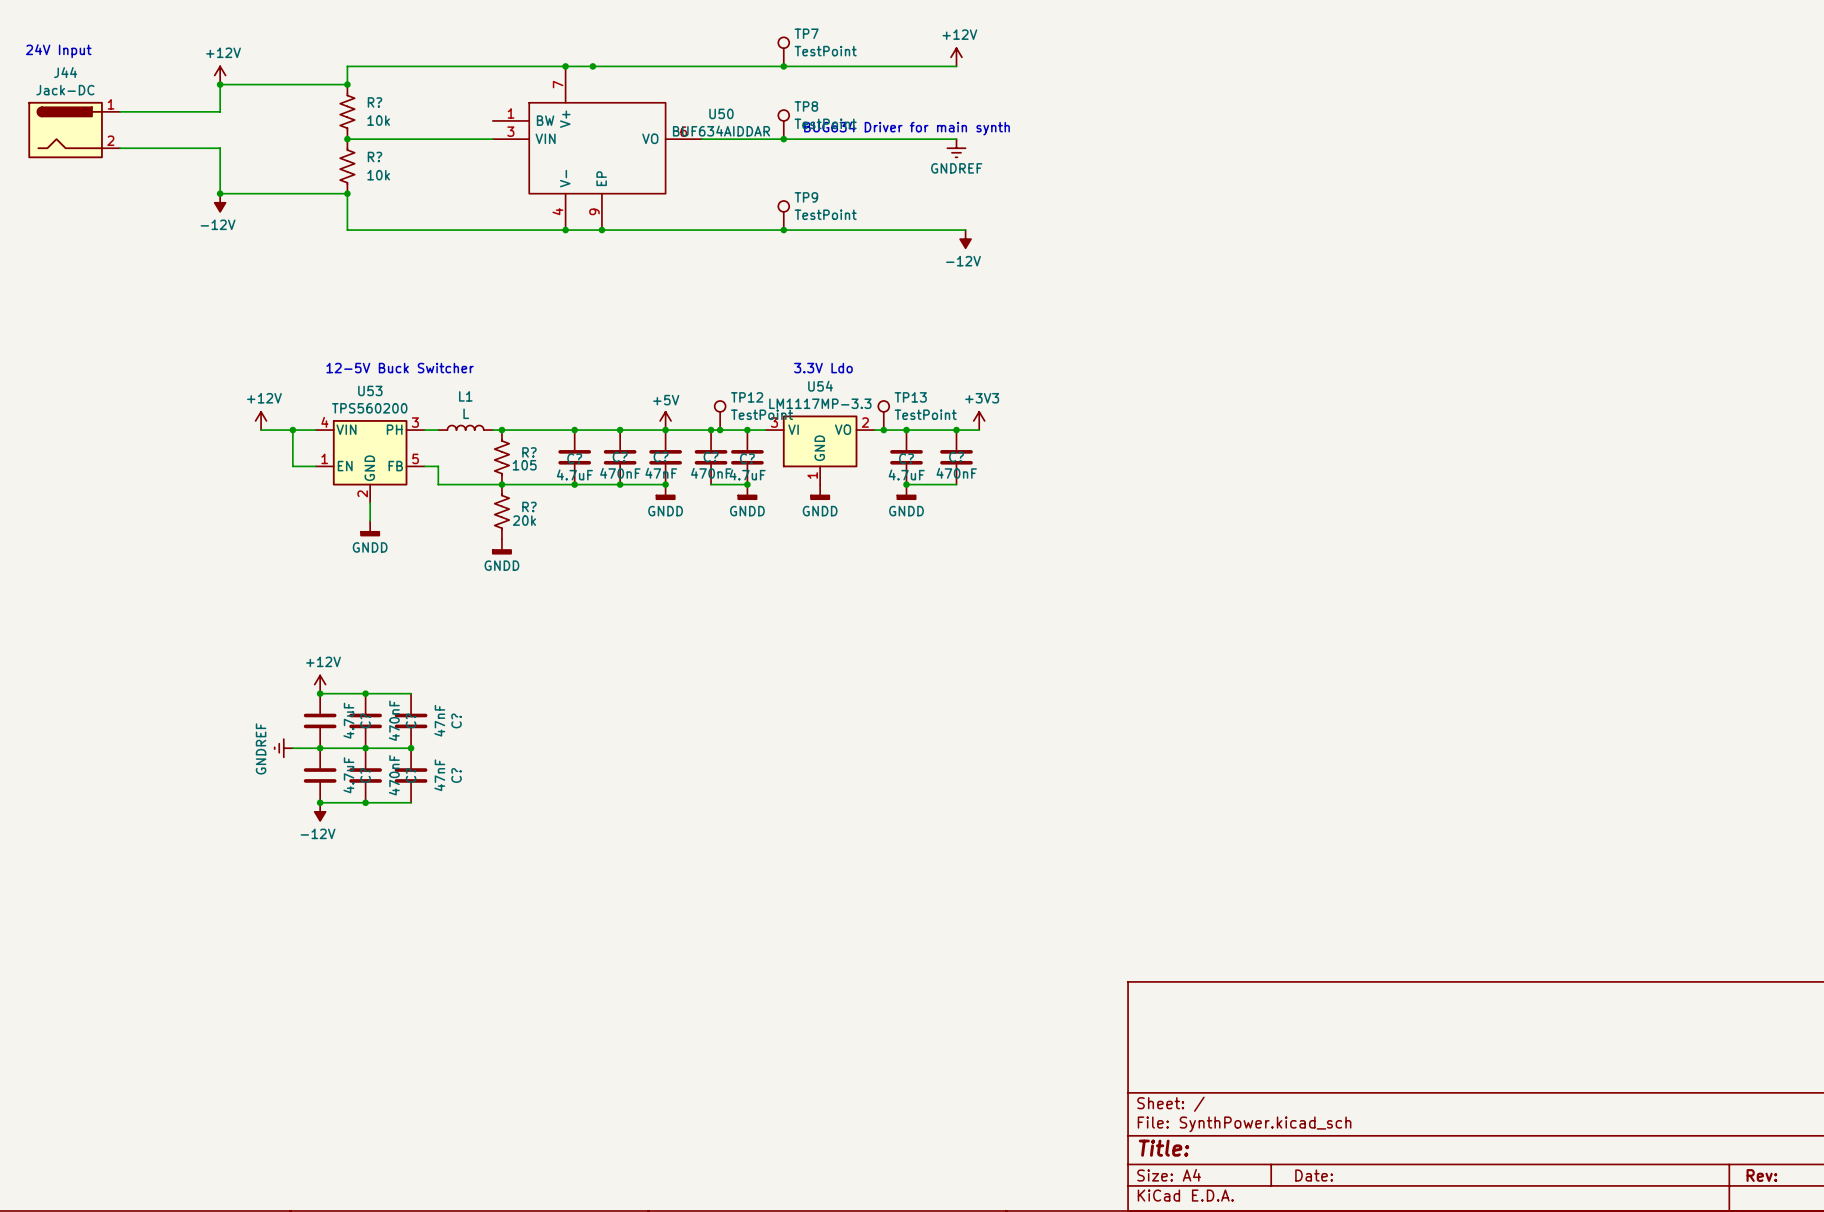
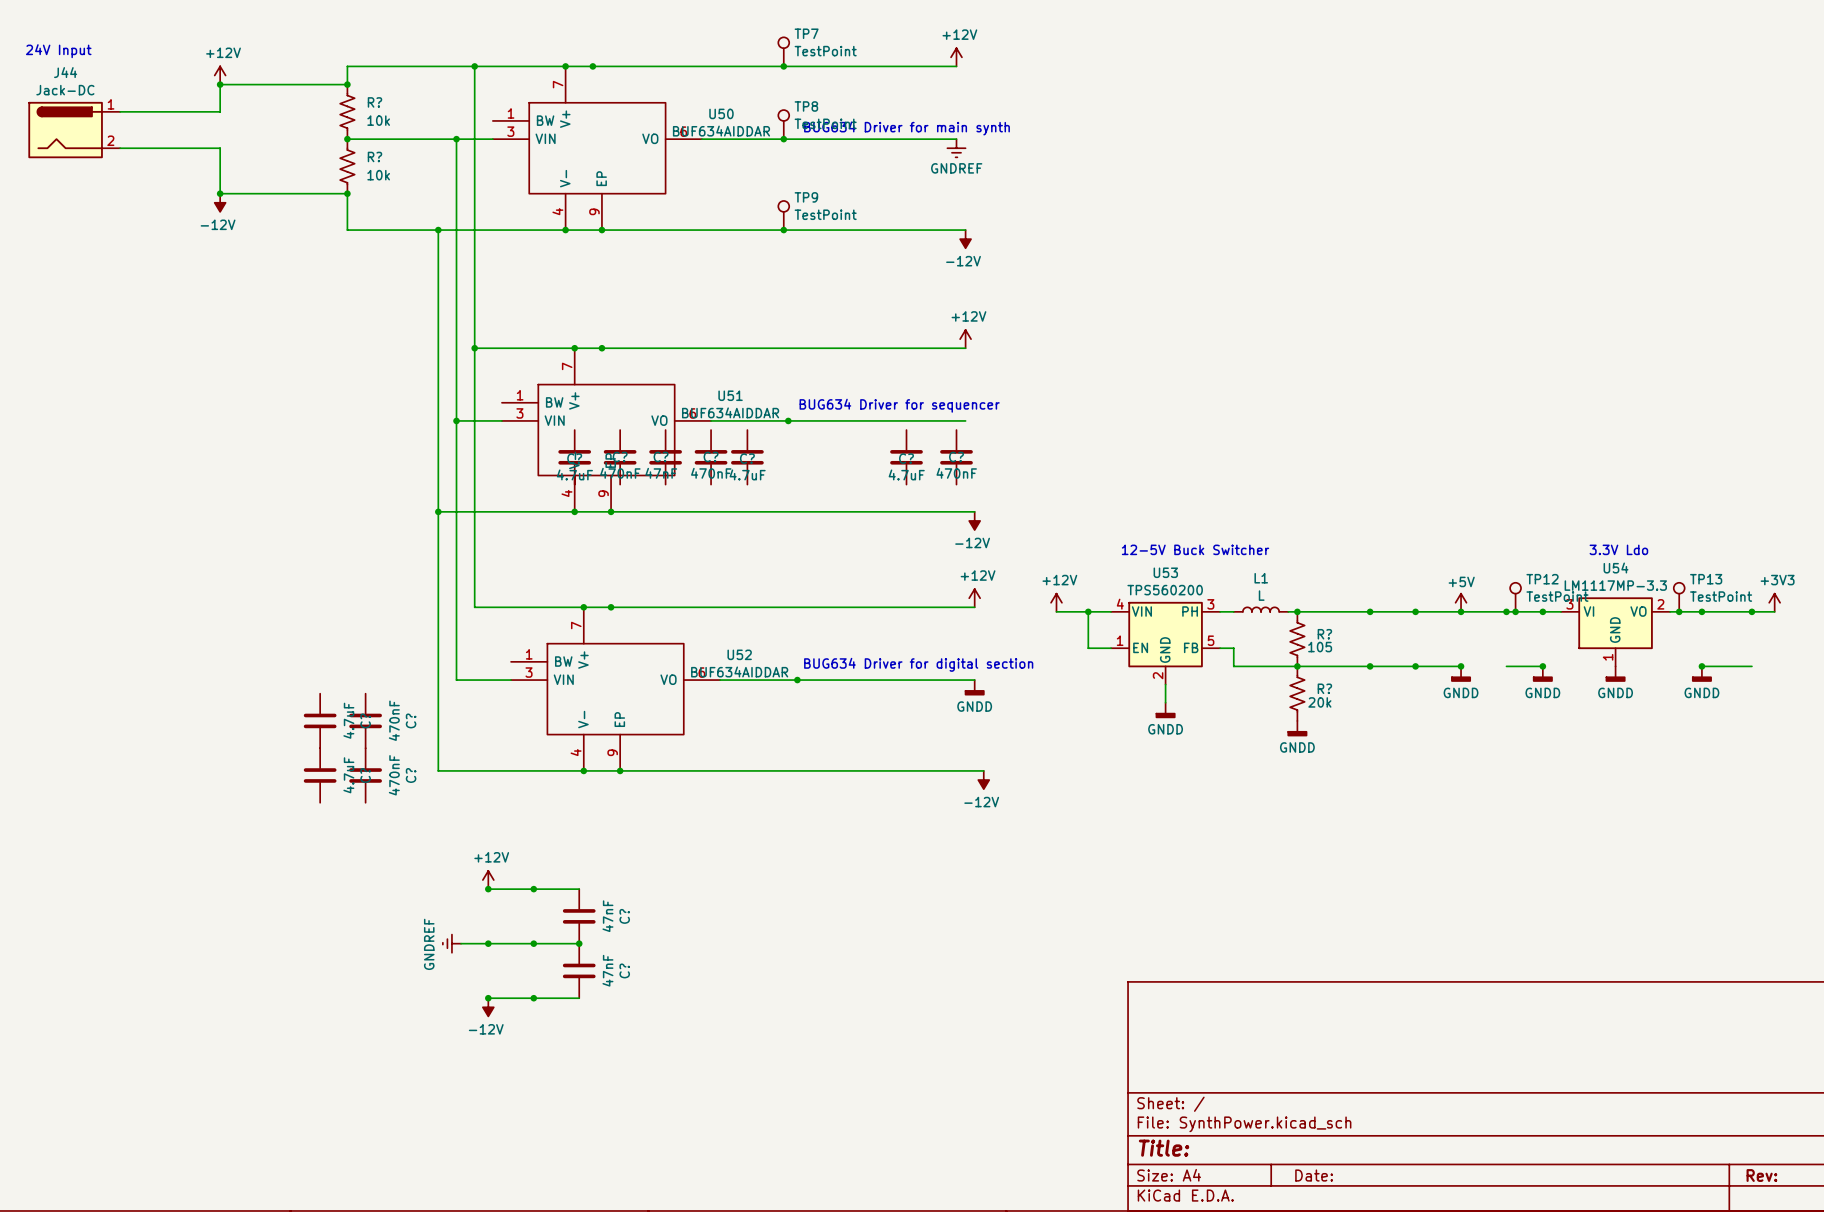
wire: none -> (474, 66) (474, 607) (974, 607)
junction: none -> (474, 66)
wire: none -> (456, 139) (456, 680) (511, 680)
junction: none -> (456, 139)
junction: none -> (438, 230)
power symbol: none -> +12V (965, 339)
wire: none -> (474, 348) (965, 348)
junction: none -> (474, 348)
junction: none -> (574, 348)
junction: none -> (601, 348)
text: 12-5V Buck Switcher (400, 368) -> none
text: 3.3V Ldo (823, 368) -> none
text: none -> BUG634 Driver for sequencer (899, 405)
TP12 position: (720, 415) -> (1515, 597)
TP13 position: (883, 415) -> (1679, 597)
power symbol: +12V (261, 420) -> none
wire: none -> (456, 420) (501, 420)
junction: none -> (456, 420)
power symbol: +5V (665, 420) -> none
wire: none -> (711, 420) (965, 420)
junction: none -> (788, 420)
power symbol: +3V3 (979, 420) -> none
L1 position: (465, 427) -> (1261, 609)
wire: (261, 430) (315, 430) -> none
wire: (292, 430) (292, 466) (315, 466) -> none
junction: (292, 430) -> none
wire: (424, 430) (438, 430) -> none
wire: (492, 430) (765, 430) -> none
junction: (501, 430) -> none
junction: (574, 430) -> none
U51: none -> BUF634AIDDAR (606, 430)
junction: (620, 430) -> none
junction: (665, 430) -> none
junction: (711, 430) -> none
junction: (720, 430) -> none
junction: (747, 430) -> none
wire: (874, 430) (979, 430) -> none
junction: (883, 430) -> none
junction: (906, 430) -> none
junction: (956, 430) -> none
U54 position: (820, 450) -> (1615, 631)
R?: 105 (501, 457) -> none
U53 position: (370, 461) -> (1165, 643)
wire: (424, 466) (438, 466) -> (438, 230) (438, 466)
wire: (438, 484) (665, 484) -> (438, 484) (438, 770) (983, 770)
junction: (501, 484) -> none
junction: (574, 484) -> none
junction: (620, 484) -> none
junction: (665, 484) -> none
wire: (711, 484) (747, 484) -> none
junction: (747, 484) -> none
wire: (906, 484) (956, 484) -> none
junction: (906, 484) -> none
power symbol: GNDD (665, 492) -> none
power symbol: GNDD (747, 492) -> none
power symbol: GNDD (820, 492) -> none
power symbol: GNDD (906, 492) -> none
wire: (370, 502) (370, 520) -> none
wire: none -> (438, 511) (974, 511)
junction: none -> (438, 511)
R?: 20k (501, 511) -> none
junction: none -> (574, 511)
junction: none -> (611, 511)
power symbol: none -> -12V (974, 520)
power symbol: GNDD (370, 528) -> none
power symbol: GNDD (501, 546) -> none
text: none -> 12-5V Buck Switcher (1195, 549)
text: none -> 3.3V Ldo (1618, 549)
power symbol: none -> +12V (974, 598)
power symbol: none -> +12V (1056, 602)
power symbol: none -> +5V (1461, 602)
power symbol: none -> +3V3 (1774, 602)
junction: none -> (583, 607)
junction: none -> (611, 607)
wire: none -> (1056, 611) (1111, 611)
wire: none -> (1088, 611) (1088, 648) (1111, 648)
junction: none -> (1088, 611)
wire: none -> (1220, 611) (1233, 611)
wire: none -> (1288, 611) (1561, 611)
junction: none -> (1297, 611)
junction: none -> (1370, 611)
junction: none -> (1415, 611)
junction: none -> (1461, 611)
junction: none -> (1506, 611)
junction: none -> (1515, 611)
junction: none -> (1542, 611)
wire: none -> (1670, 611) (1774, 611)
junction: none -> (1679, 611)
junction: none -> (1701, 611)
junction: none -> (1751, 611)
R?: none -> 105 (1297, 639)
wire: none -> (1220, 648) (1233, 648) (1233, 666) (1461, 666)
text: none -> BUG634 Driver for digital section (918, 664)
junction: none -> (1297, 666)
junction: none -> (1370, 666)
junction: none -> (1415, 666)
junction: none -> (1461, 666)
wire: none -> (1506, 666) (1542, 666)
junction: none -> (1542, 666)
wire: none -> (1701, 666) (1751, 666)
junction: none -> (1701, 666)
power symbol: none -> GNDD (1461, 674)
power symbol: none -> GNDD (1542, 674)
power symbol: none -> GNDD (1615, 674)
power symbol: none -> GNDD (1701, 674)
wire: none -> (720, 680) (974, 680)
junction: none -> (797, 680)
power symbol: +12V (320, 684) -> none
wire: none -> (1165, 684) (1165, 702)
power symbol: none -> GNDD (974, 687)
U52: none -> BUF634AIDDAR (615, 689)
wire: (320, 693) (411, 693) -> none
junction: (320, 693) -> none
junction: (365, 693) -> none
R?: none -> 20k (1297, 693)
power symbol: none -> GNDD (1165, 710)
C?: 47nF (411, 720) -> none
power symbol: none -> GNDD (1297, 728)
power symbol: GNDREF (283, 748) -> none
wire: (292, 748) (411, 748) -> none
junction: (320, 748) -> none
junction: (365, 748) -> none
junction: (411, 748) -> none
junction: none -> (583, 770)
junction: none -> (620, 770)
C?: 47nF (411, 775) -> none
power symbol: none -> -12V (983, 780)
wire: (320, 802) (411, 802) -> none
junction: (320, 802) -> none
junction: (365, 802) -> none
power symbol: -12V (320, 811) -> none
power symbol: none -> +12V (488, 880)
wire: none -> (488, 889) (579, 889)
junction: none -> (488, 889)
junction: none -> (533, 889)
C?: none -> 47nF (579, 916)
power symbol: none -> GNDREF (451, 943)
wire: none -> (461, 943) (579, 943)
junction: none -> (488, 943)
junction: none -> (533, 943)
junction: none -> (579, 943)
C?: none -> 47nF (579, 970)
wire: none -> (488, 998) (579, 998)
junction: none -> (488, 998)
junction: none -> (533, 998)
power symbol: none -> -12V (488, 1007)

